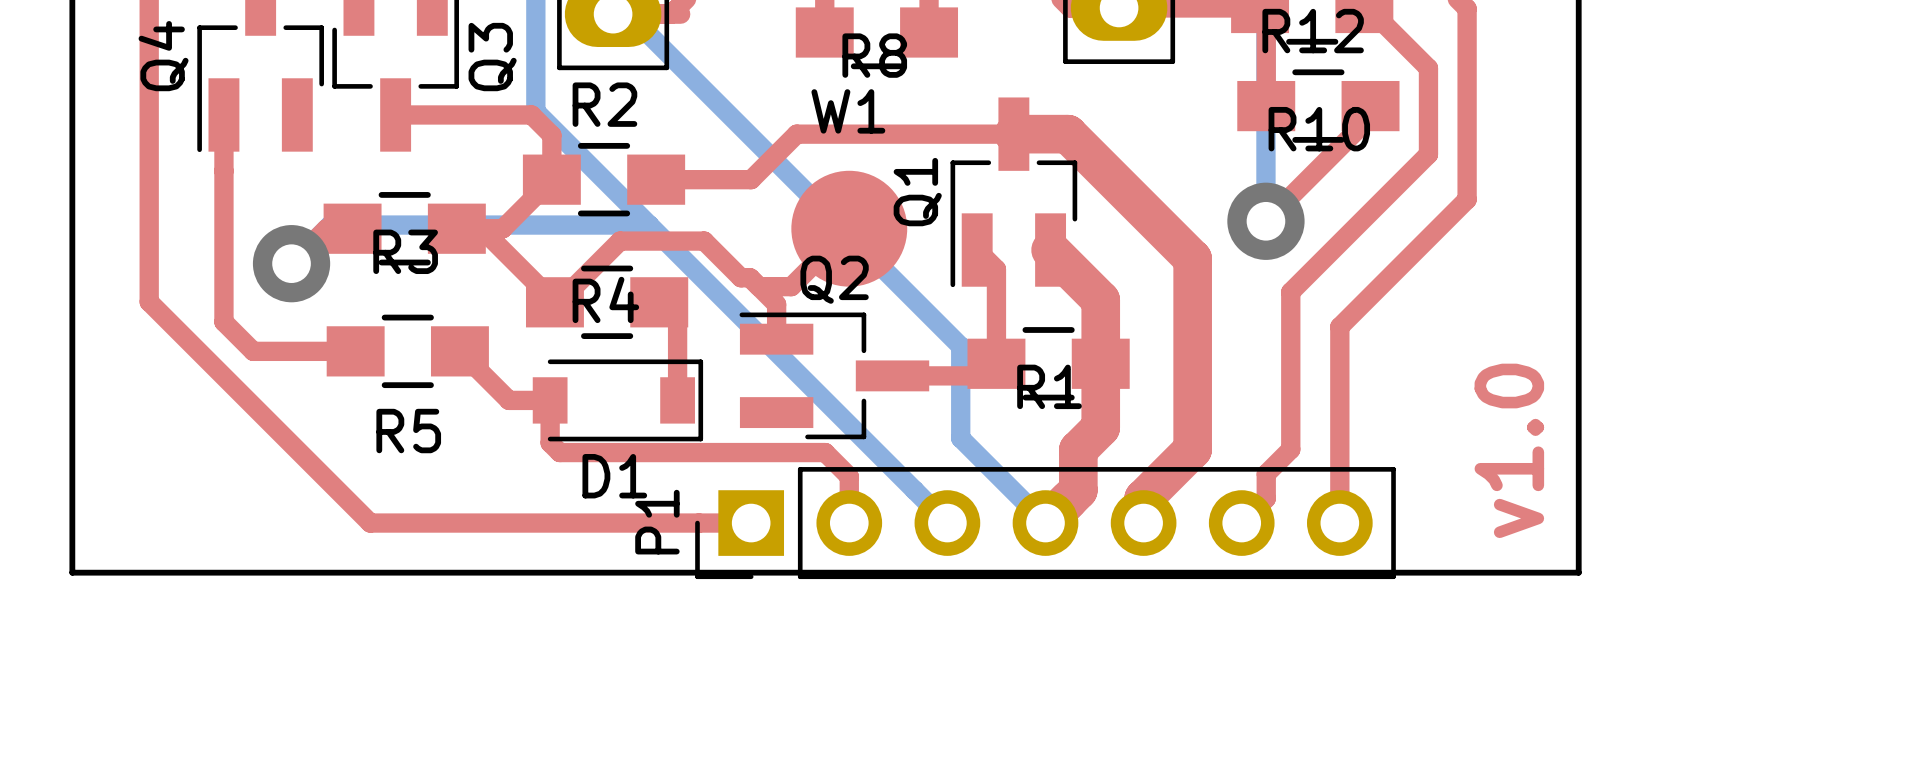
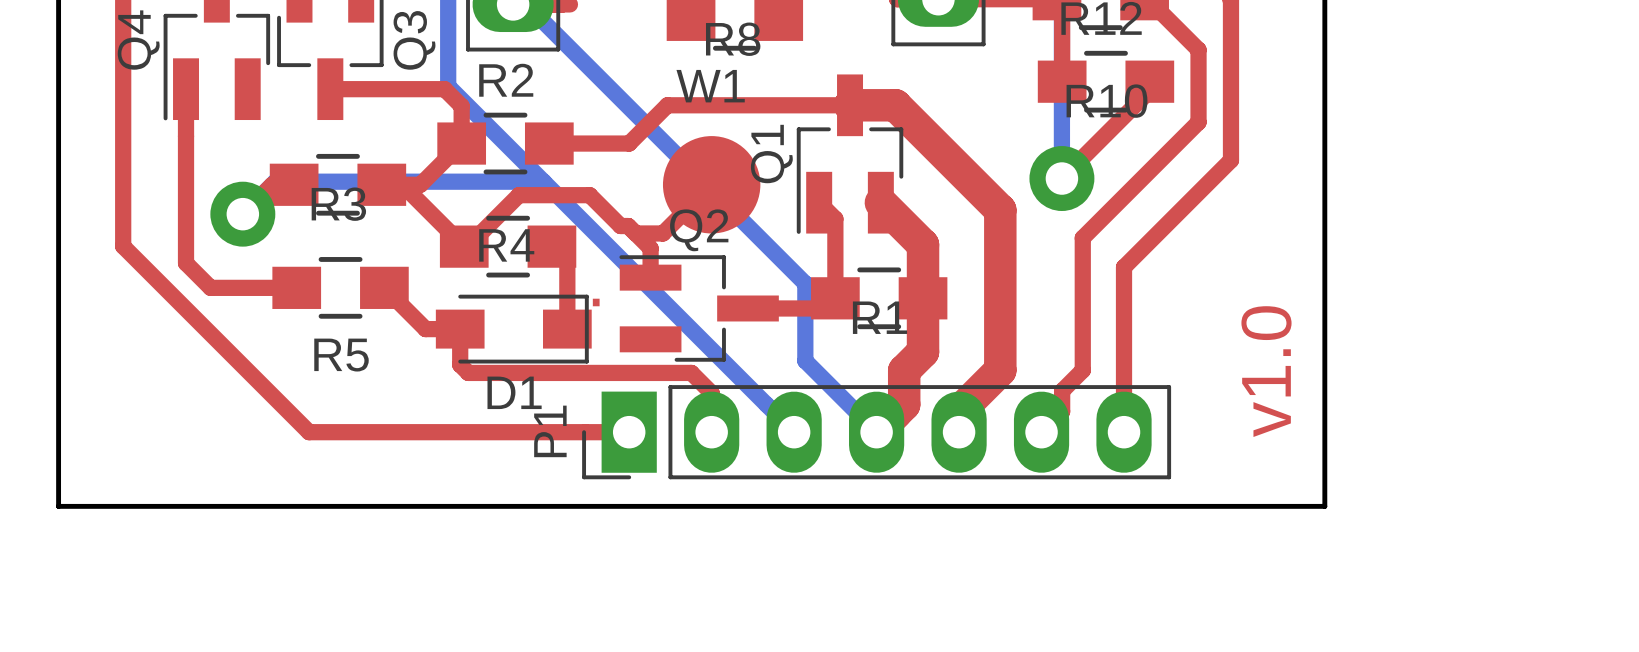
D1 footprint: [532, 359, 704, 442] -> [435, 294, 592, 364]
text: none -> . (596, 302)
P1 footprint: [695, 467, 1396, 580] -> [582, 385, 1172, 480]
board edge: (72, 572) (1578, 572) -> (58, 473) (58, 506) (1324, 506) (1324, 473)

